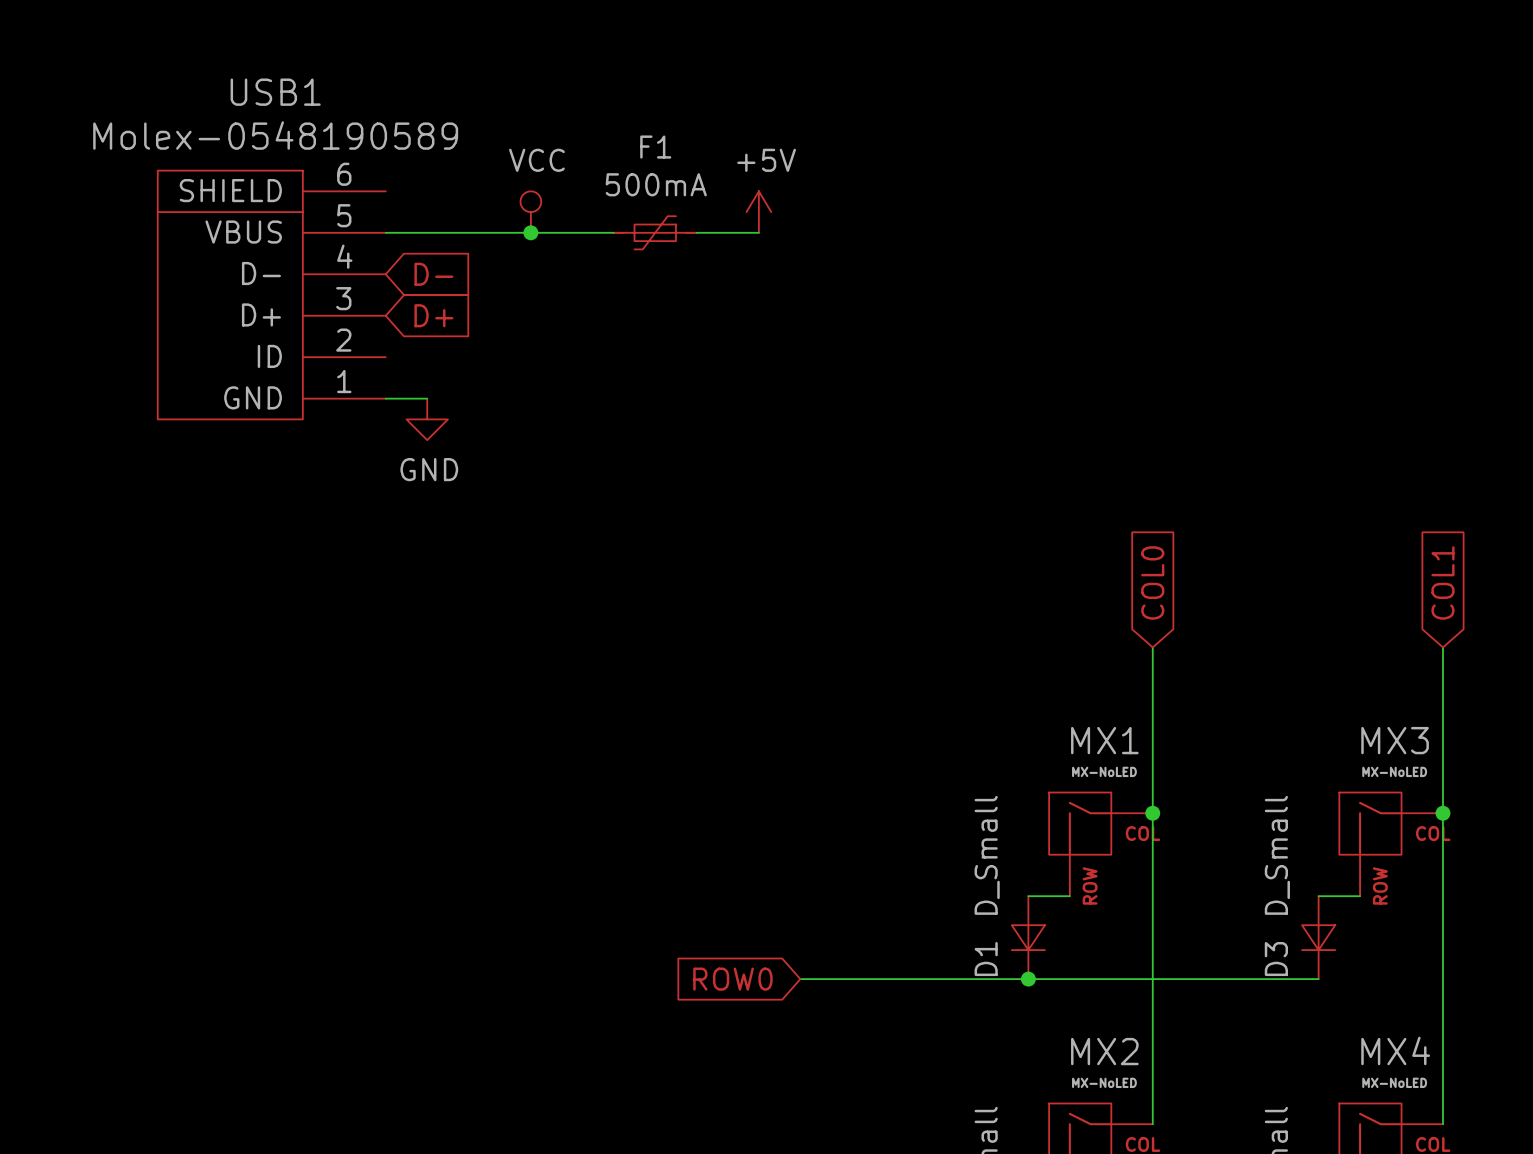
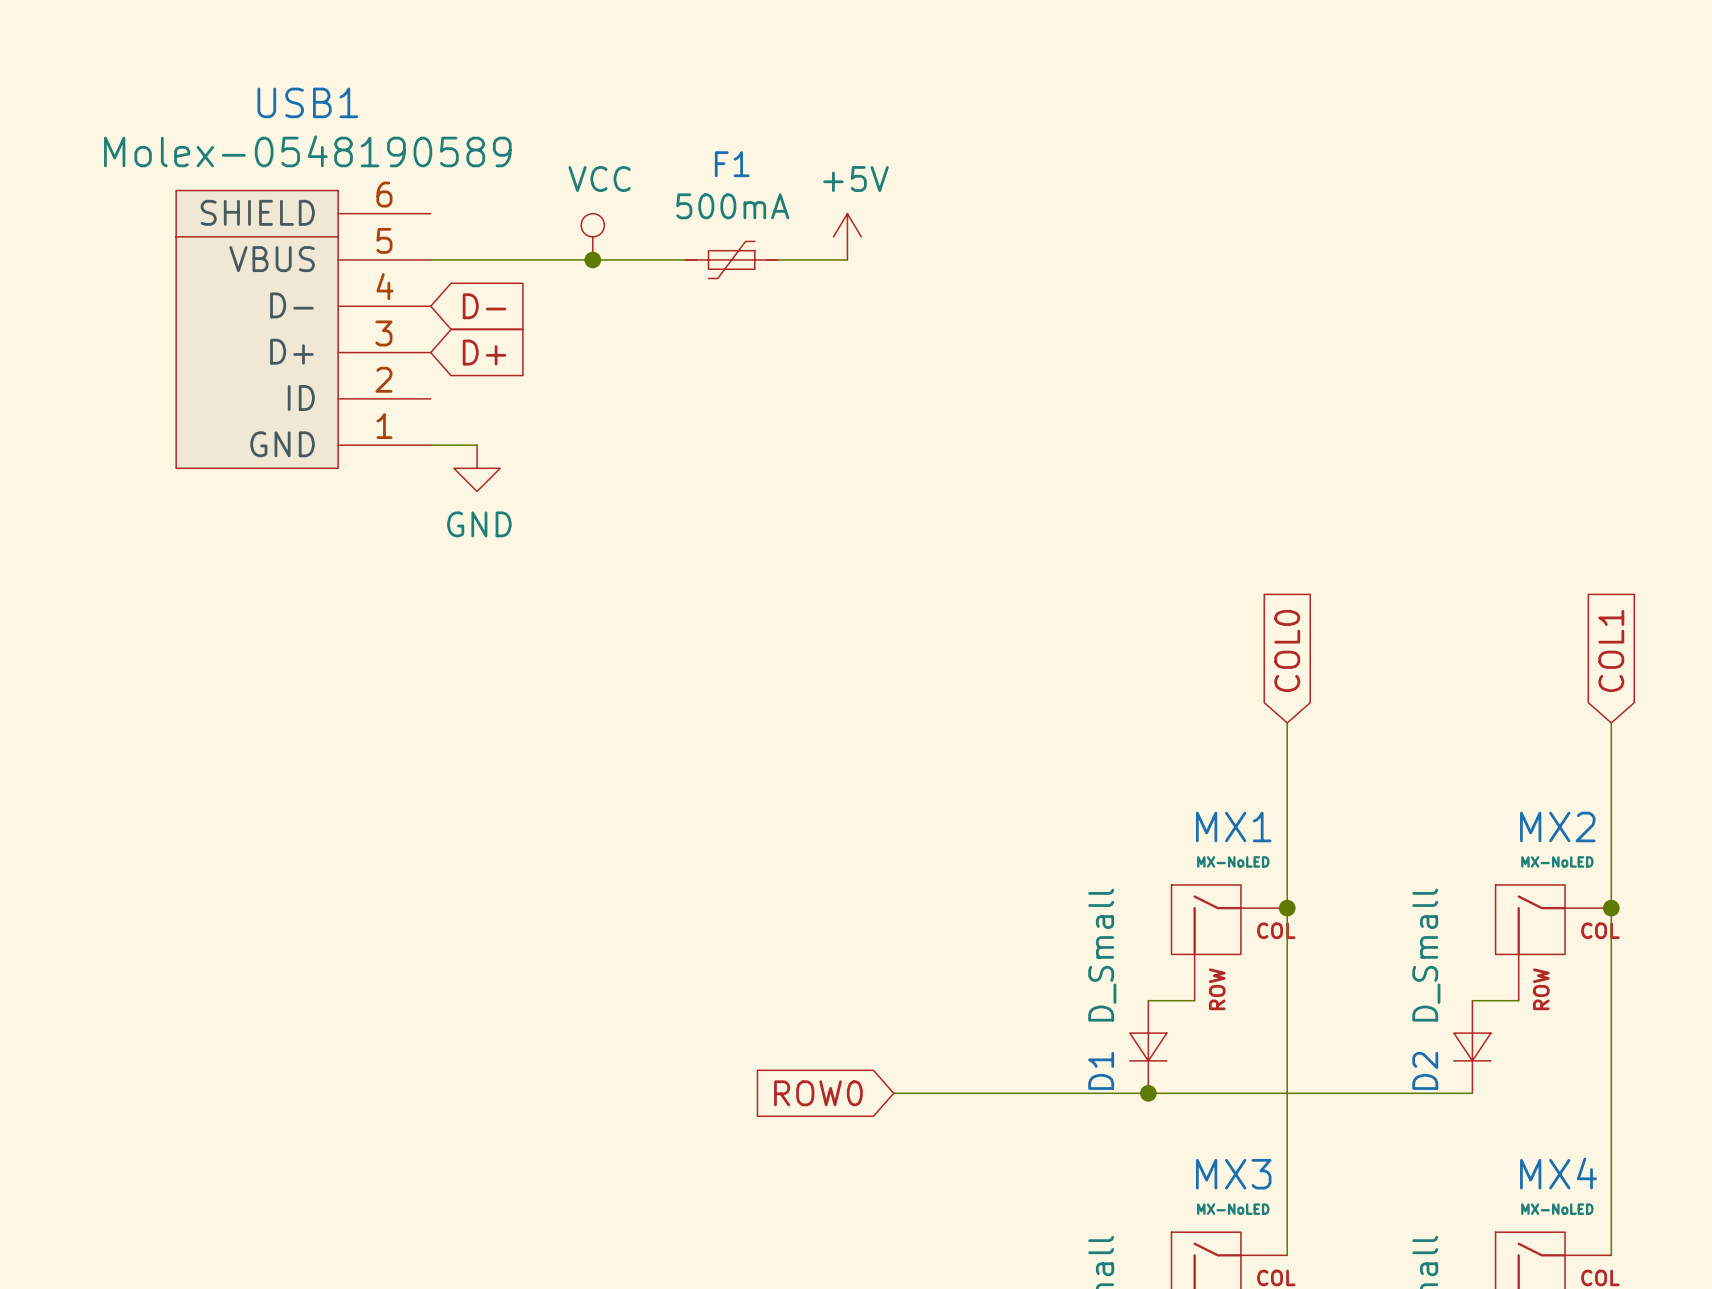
MX3 name: MX3 (1395, 740) -> MX2 (1557, 826)
D3 name: D3 (1276, 959) -> D2 (1425, 1070)
MX2 name: MX2 (1104, 1051) -> MX3 (1233, 1174)

